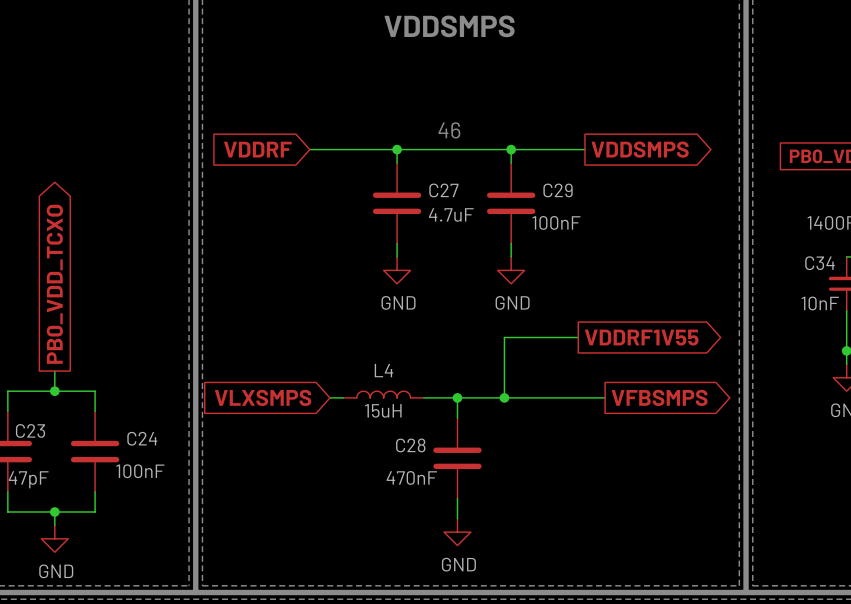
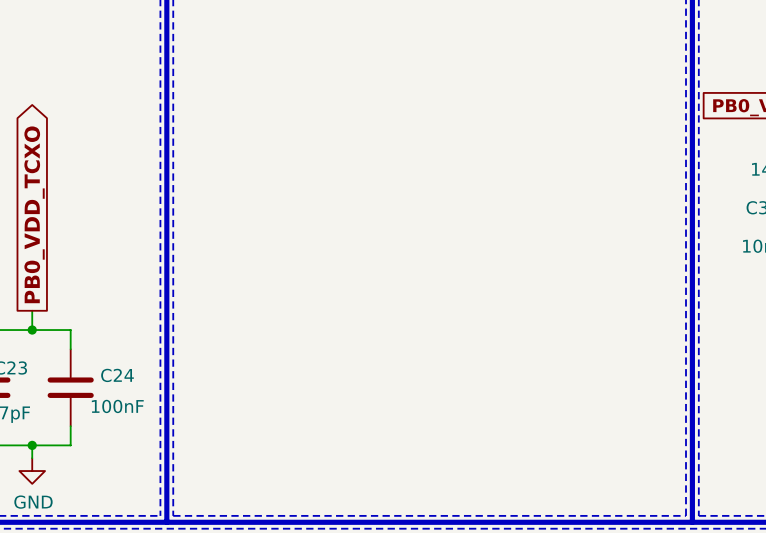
text: 46 (449, 130) -> none
global label: VDDRF (257, 149) -> none
wire: (309, 149) (584, 149) -> none
wire: (397, 149) (397, 163) -> none
junction: (397, 149) -> none
wire: (511, 149) (511, 163) -> none
junction: (511, 149) -> none
global label: VDDSMPS (640, 149) -> none
C27: 4.7uF (397, 203) -> none
C29: 100nF (511, 203) -> none
wire: (397, 243) (397, 256) -> none
wire: (511, 243) (511, 256) -> none
power symbol: GND (397, 270) -> none
power symbol: GND (511, 270) -> none
wire: (578, 337) (504, 337) (504, 397) -> none
global label: VDDRF1V55 (641, 337) -> none
L4: 15uH (383, 394) -> none
global label: VLXSMPS (263, 397) -> none
wire: (329, 397) (343, 397) -> none
wire: (423, 397) (605, 397) -> none
wire: (457, 397) (457, 418) -> none
junction: (457, 397) -> none
junction: (504, 397) -> none
global label: VFBSMPS (659, 397) -> none
C28: 470nF (457, 458) -> none
wire: (457, 498) (457, 518) -> none
power symbol: GND (457, 532) -> none

